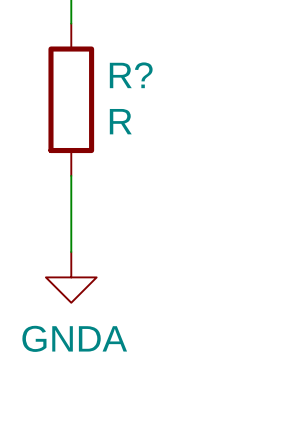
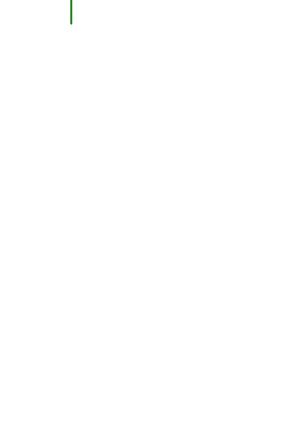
R?: R (71, 99) -> none
wire: (71, 175) (71, 252) -> none
power symbol: GNDA (71, 277) -> none

